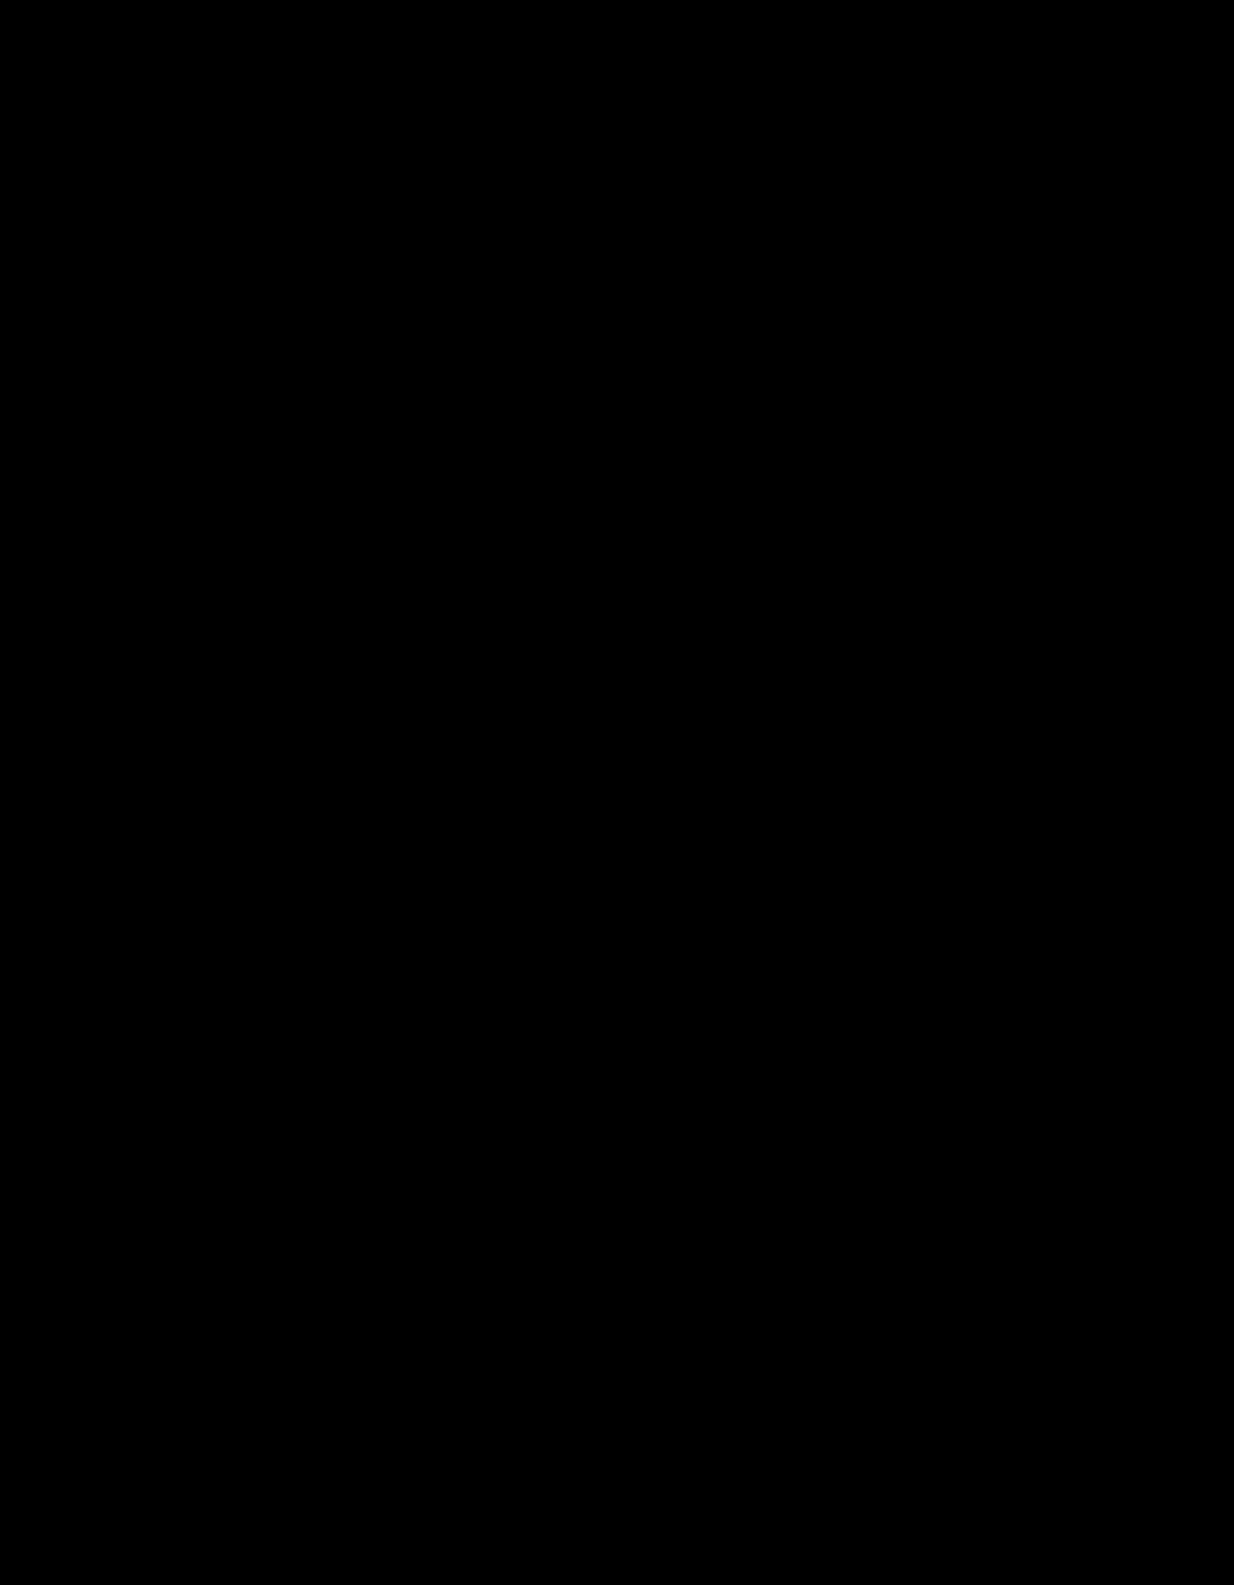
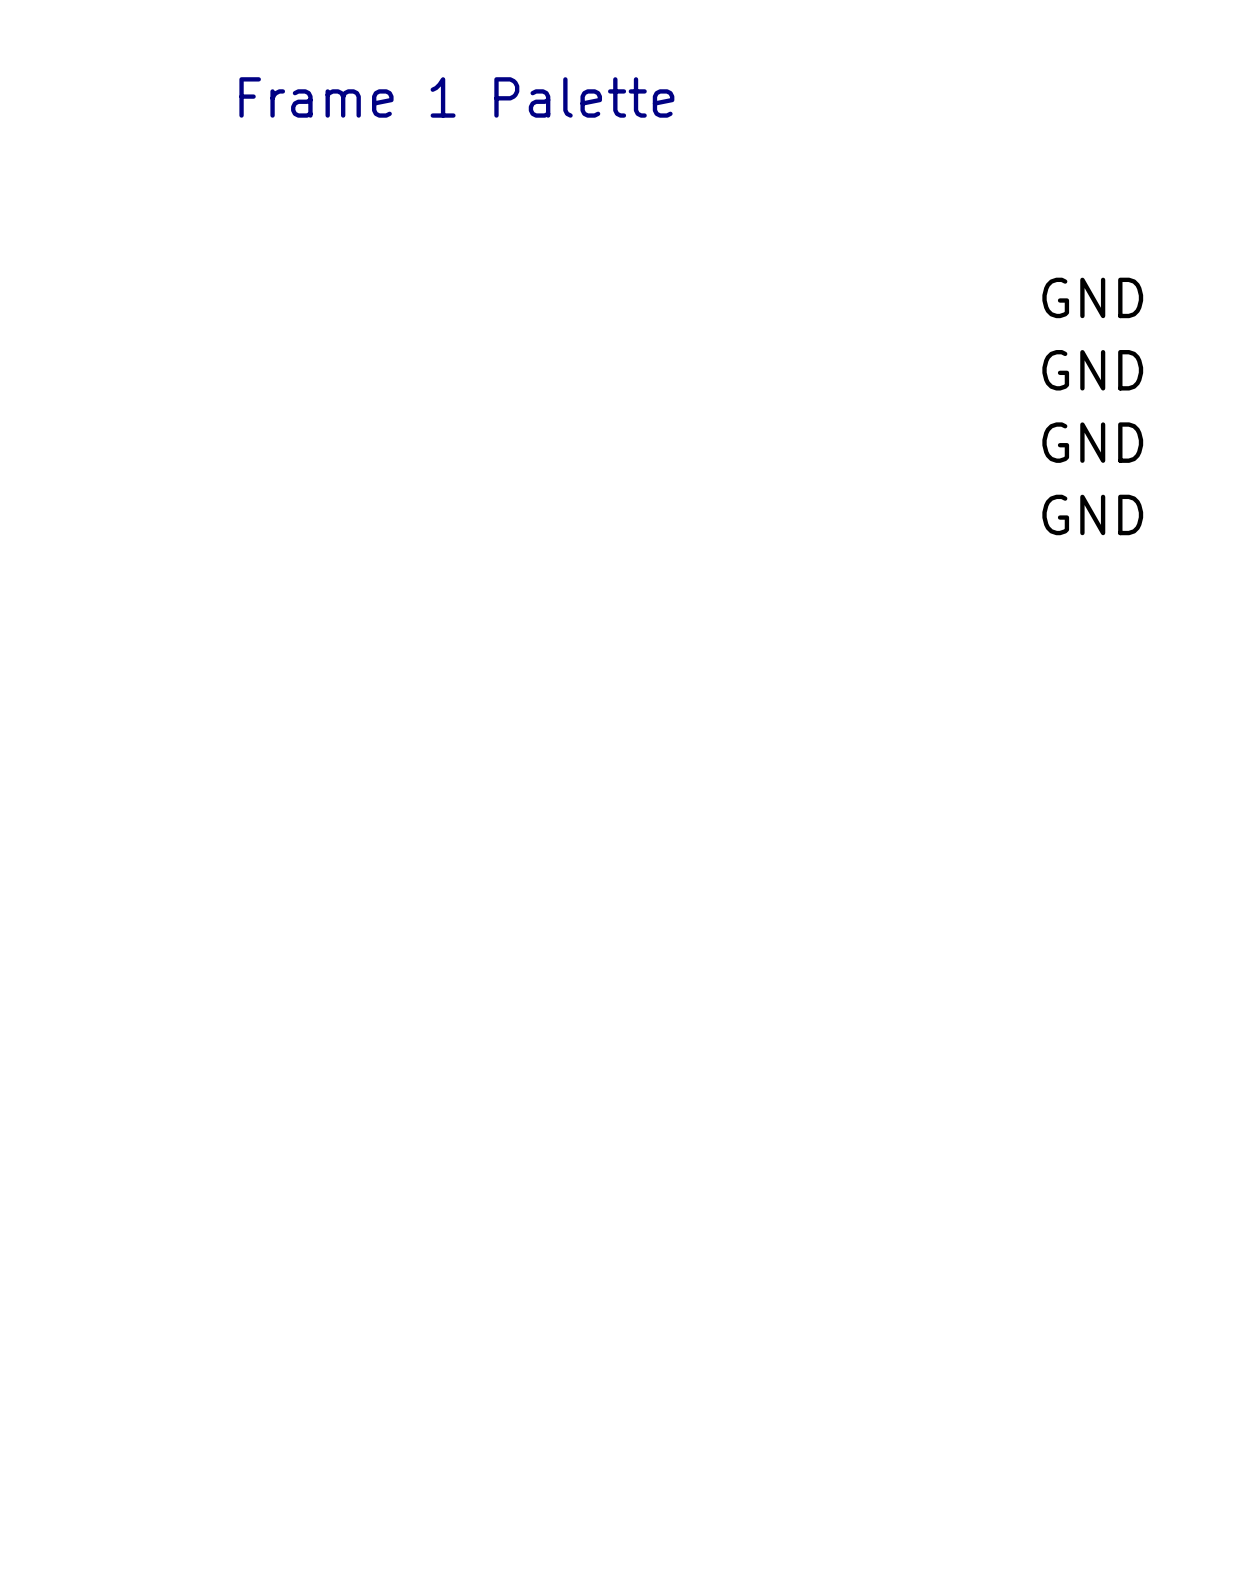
text: none -> Frame 1 Palette (456, 97)
label: none -> GND (1092, 297)
label: none -> GND (1092, 370)
label: none -> GND (1092, 442)
label: none -> GND (1092, 514)

